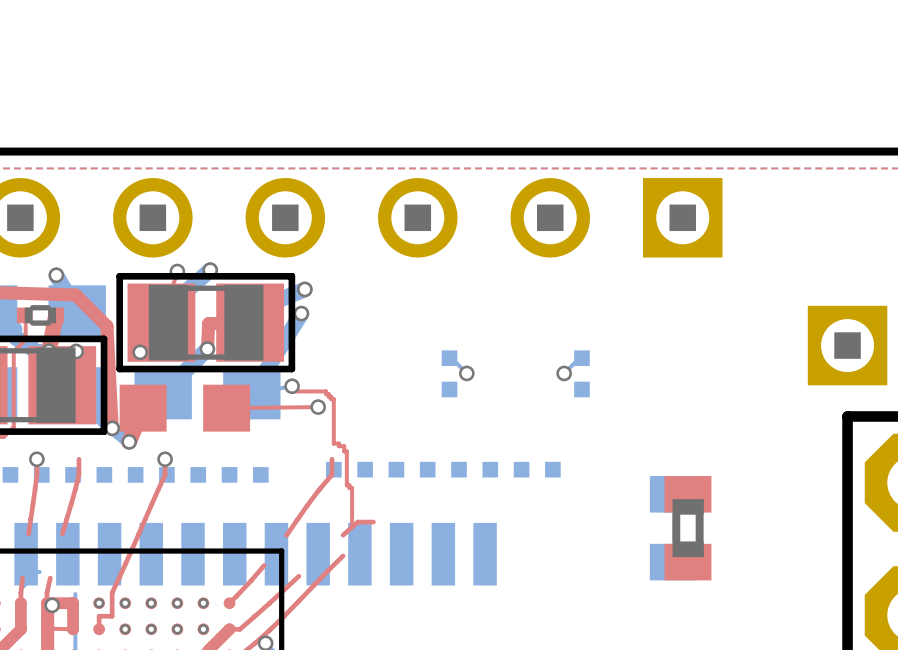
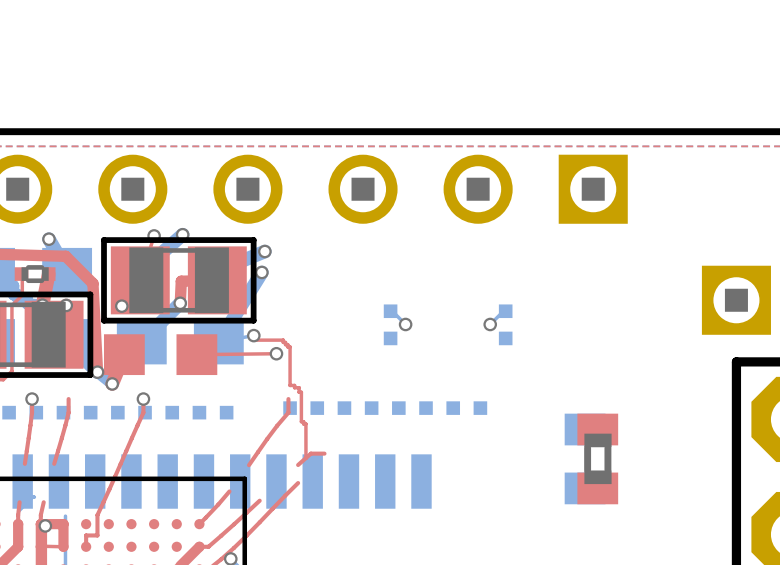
via: (99, 603) -> none
via: (125, 603) -> none
via: (151, 603) -> none
via: (177, 603) -> none
via: (203, 603) -> none
via: (125, 629) -> none
via: (151, 629) -> none
via: (177, 629) -> none
via: (203, 629) -> none

